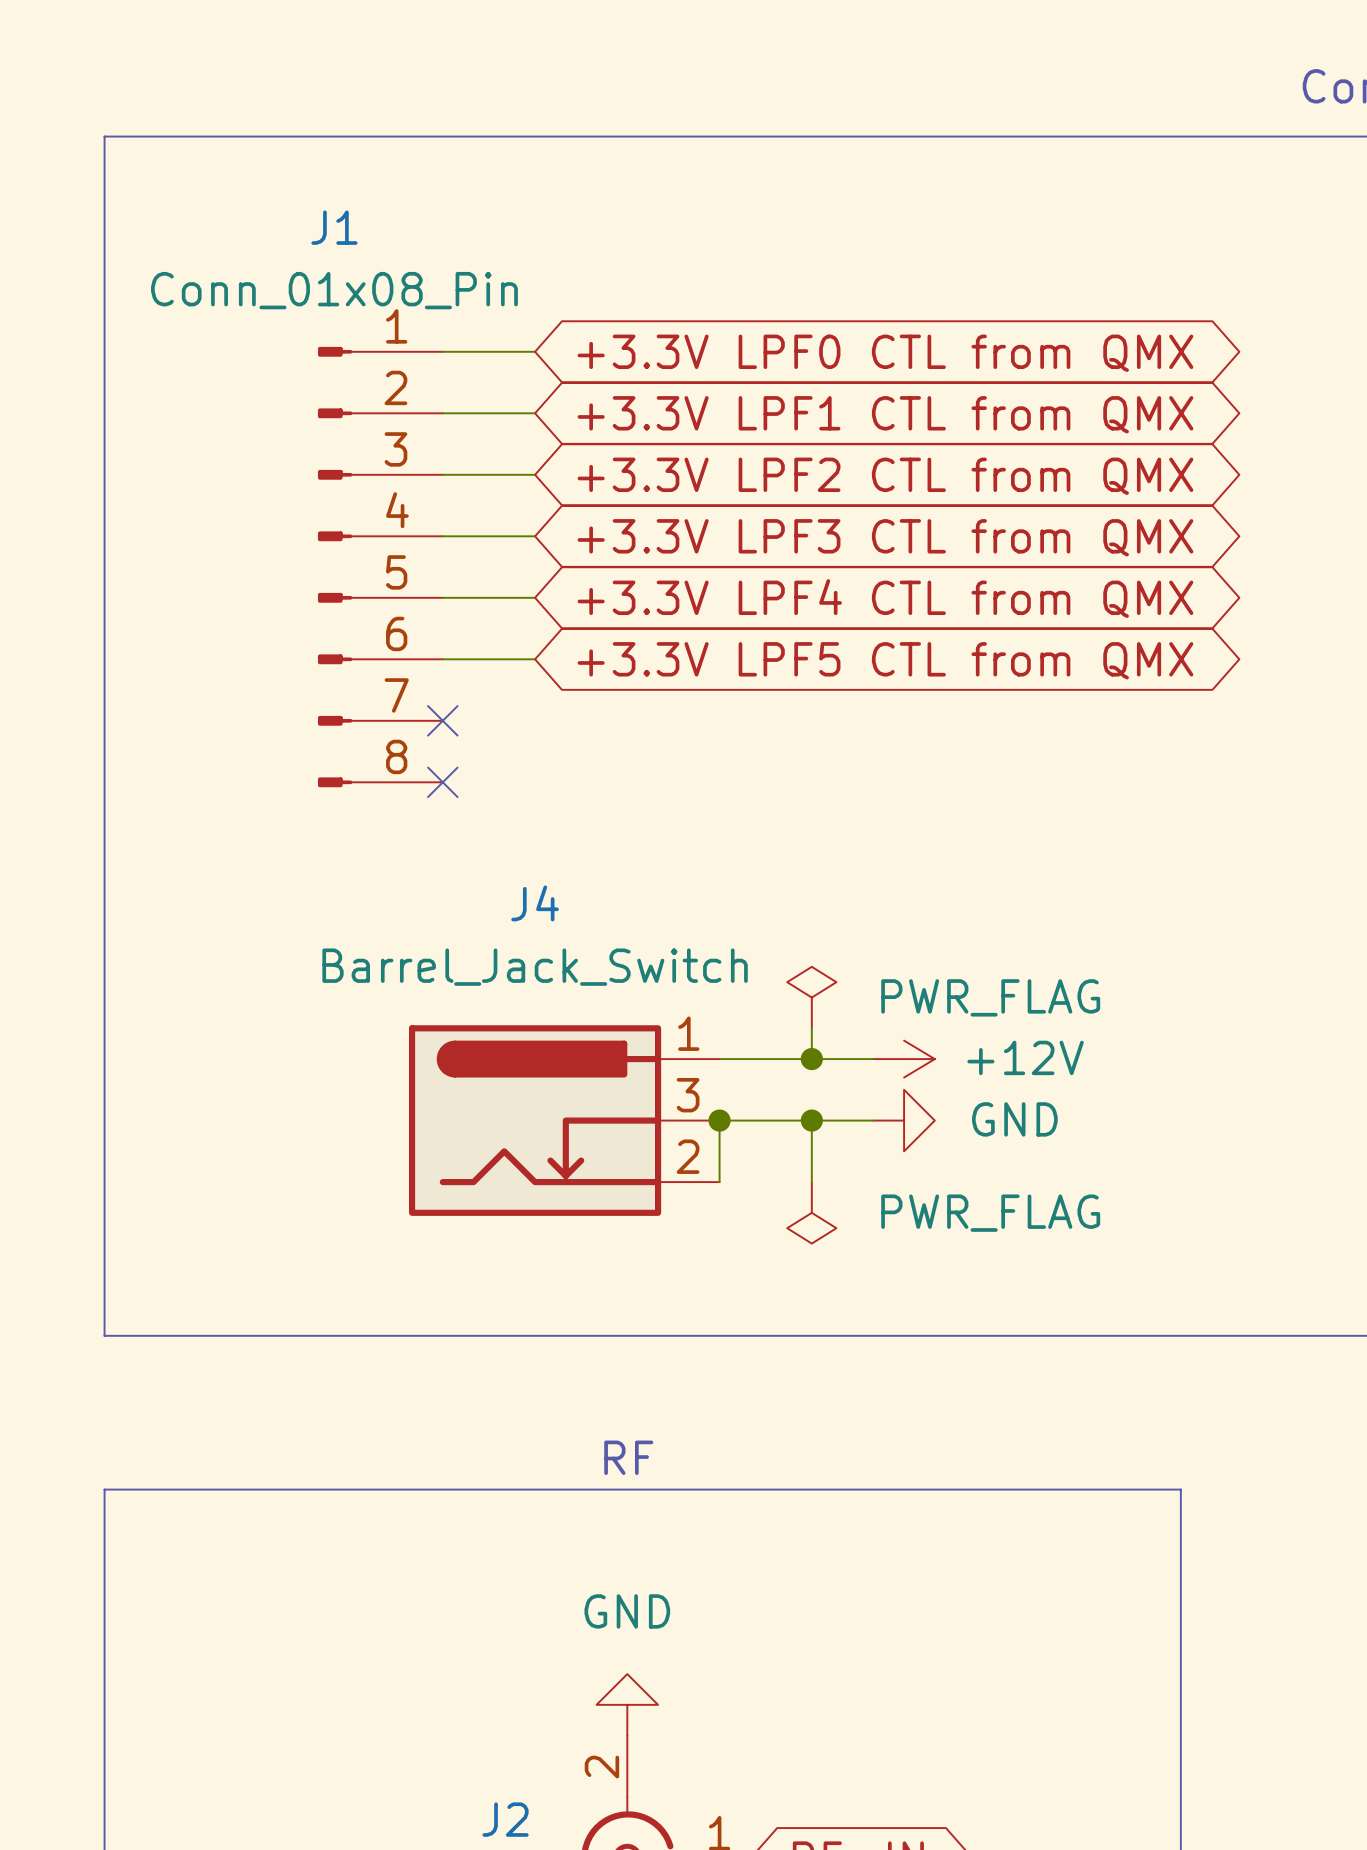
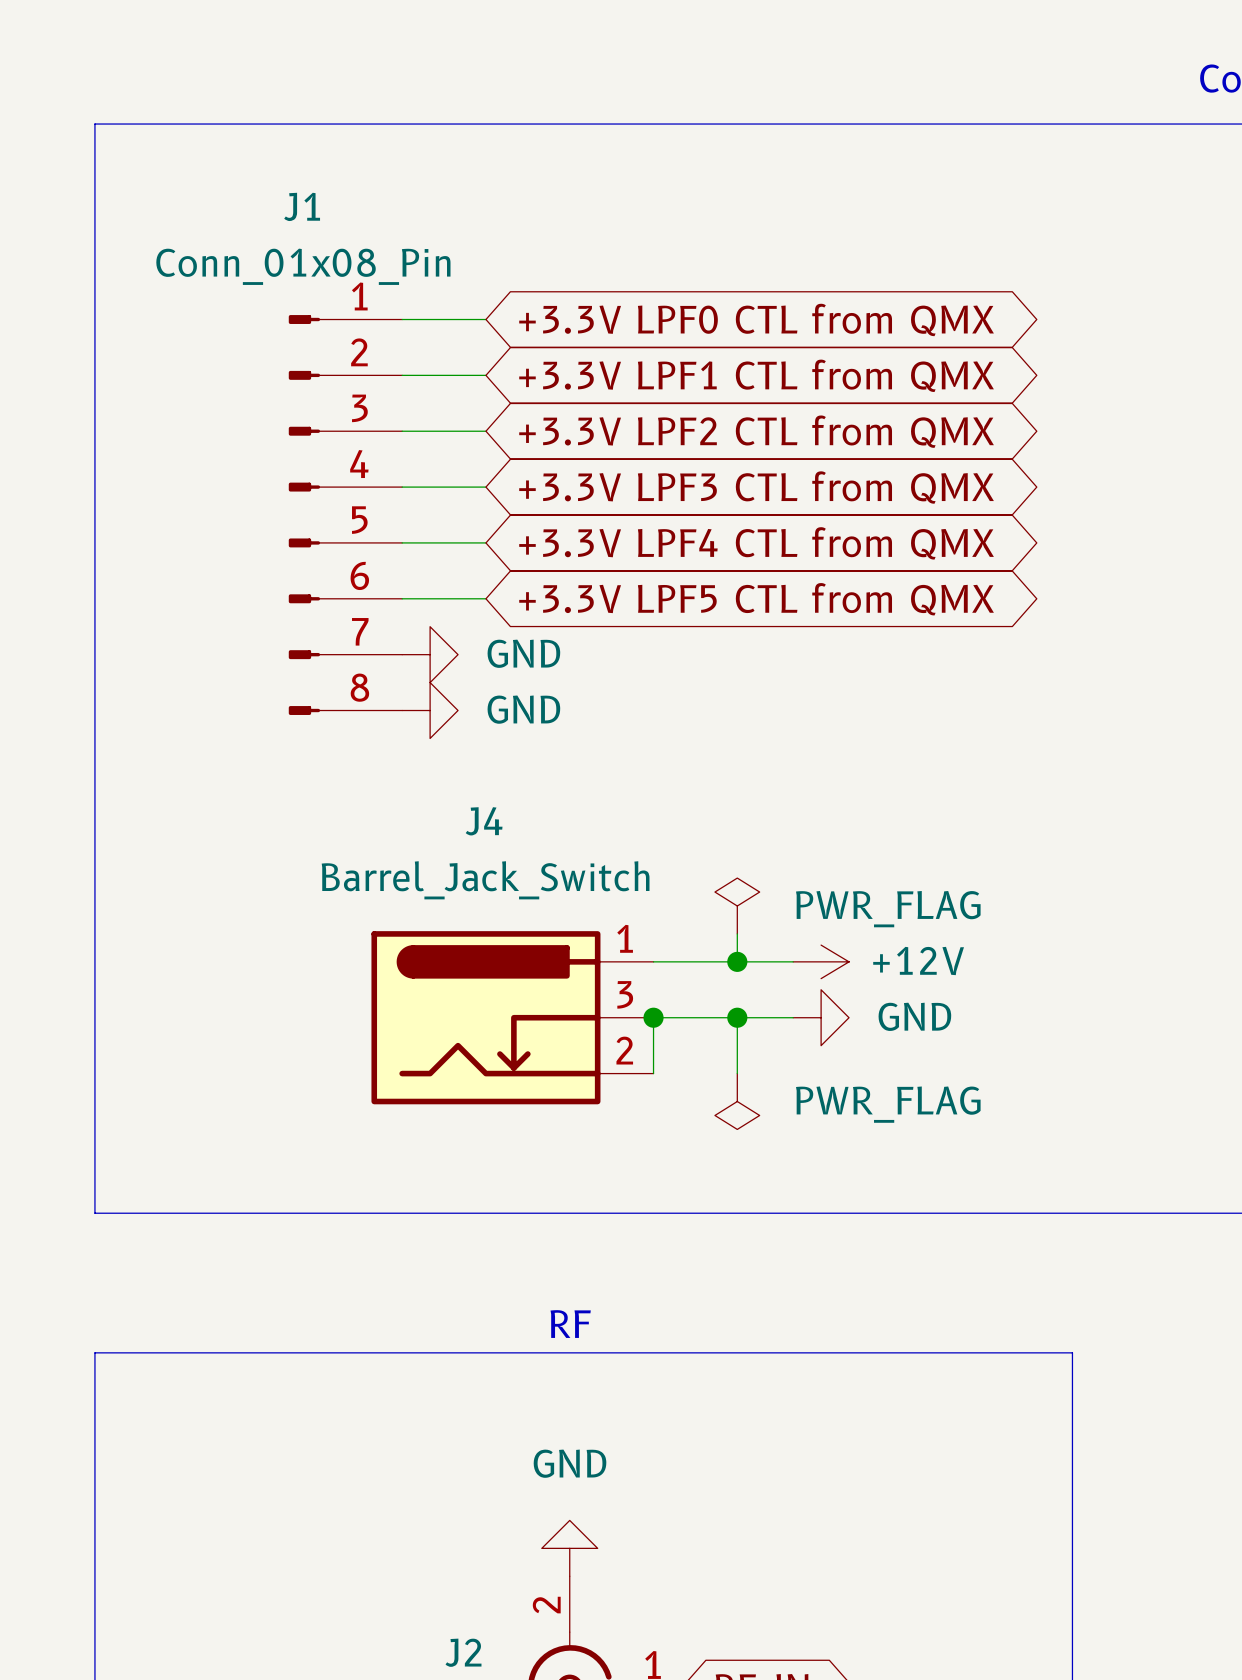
no-connect mark: (442, 720) -> none
power symbol: none -> GND (430, 654)
no-connect mark: (442, 782) -> none
power symbol: none -> GND (430, 710)

